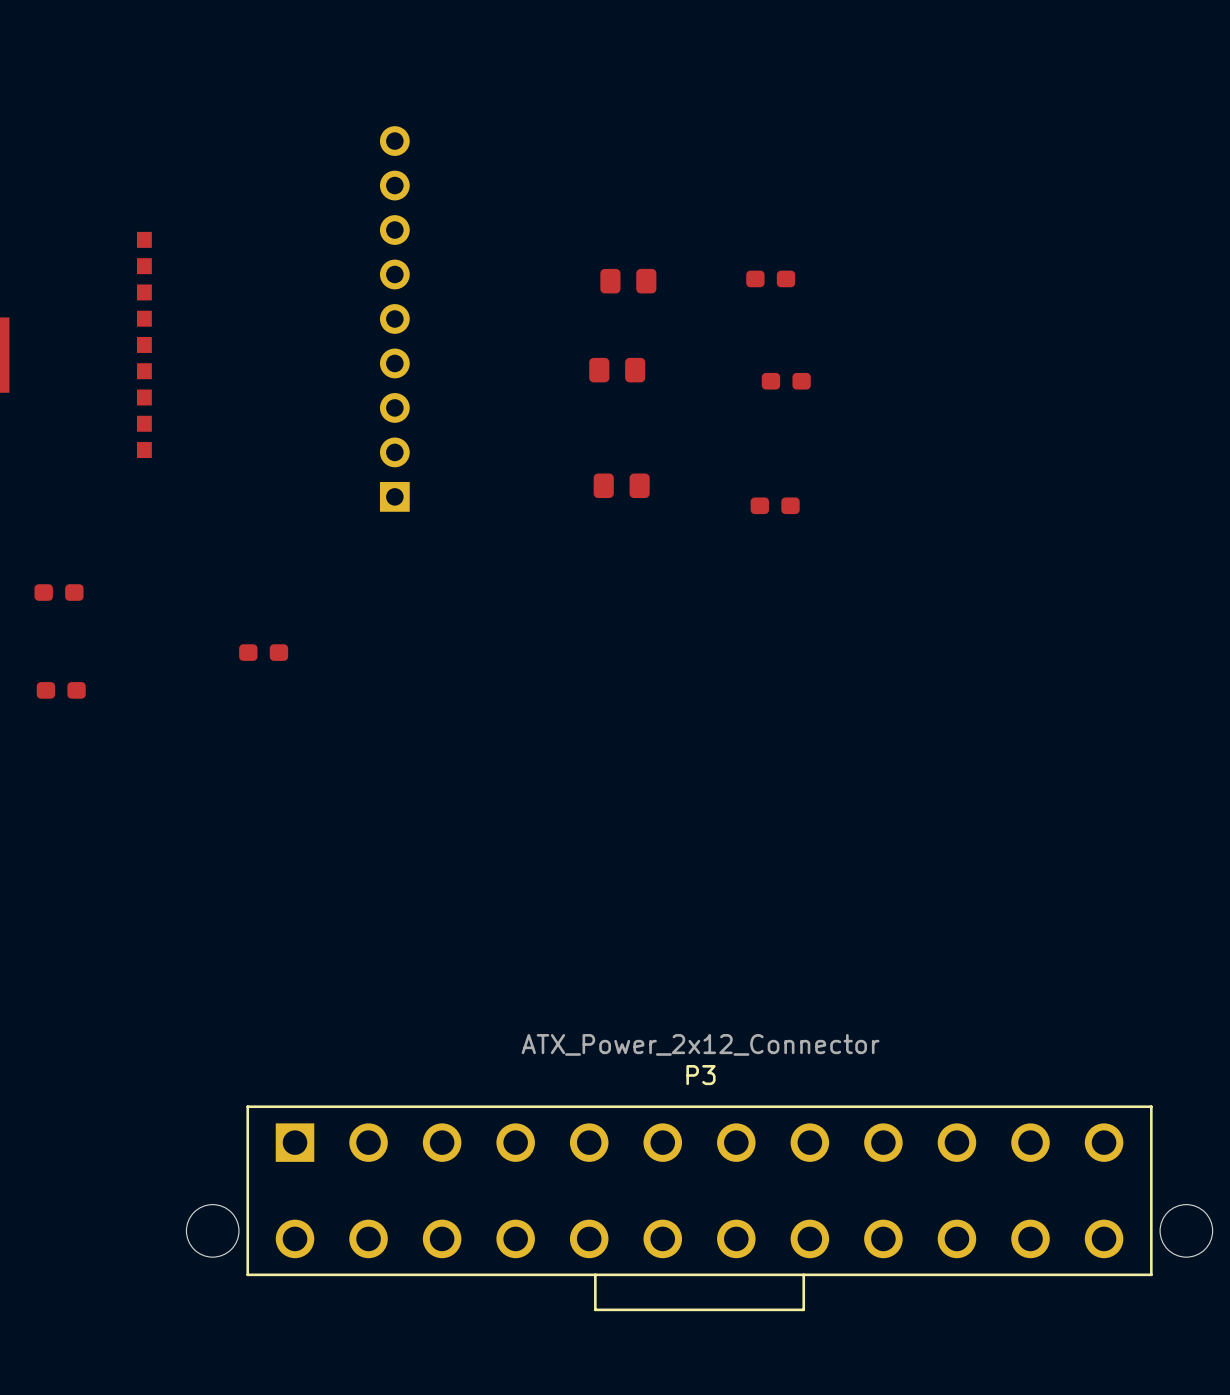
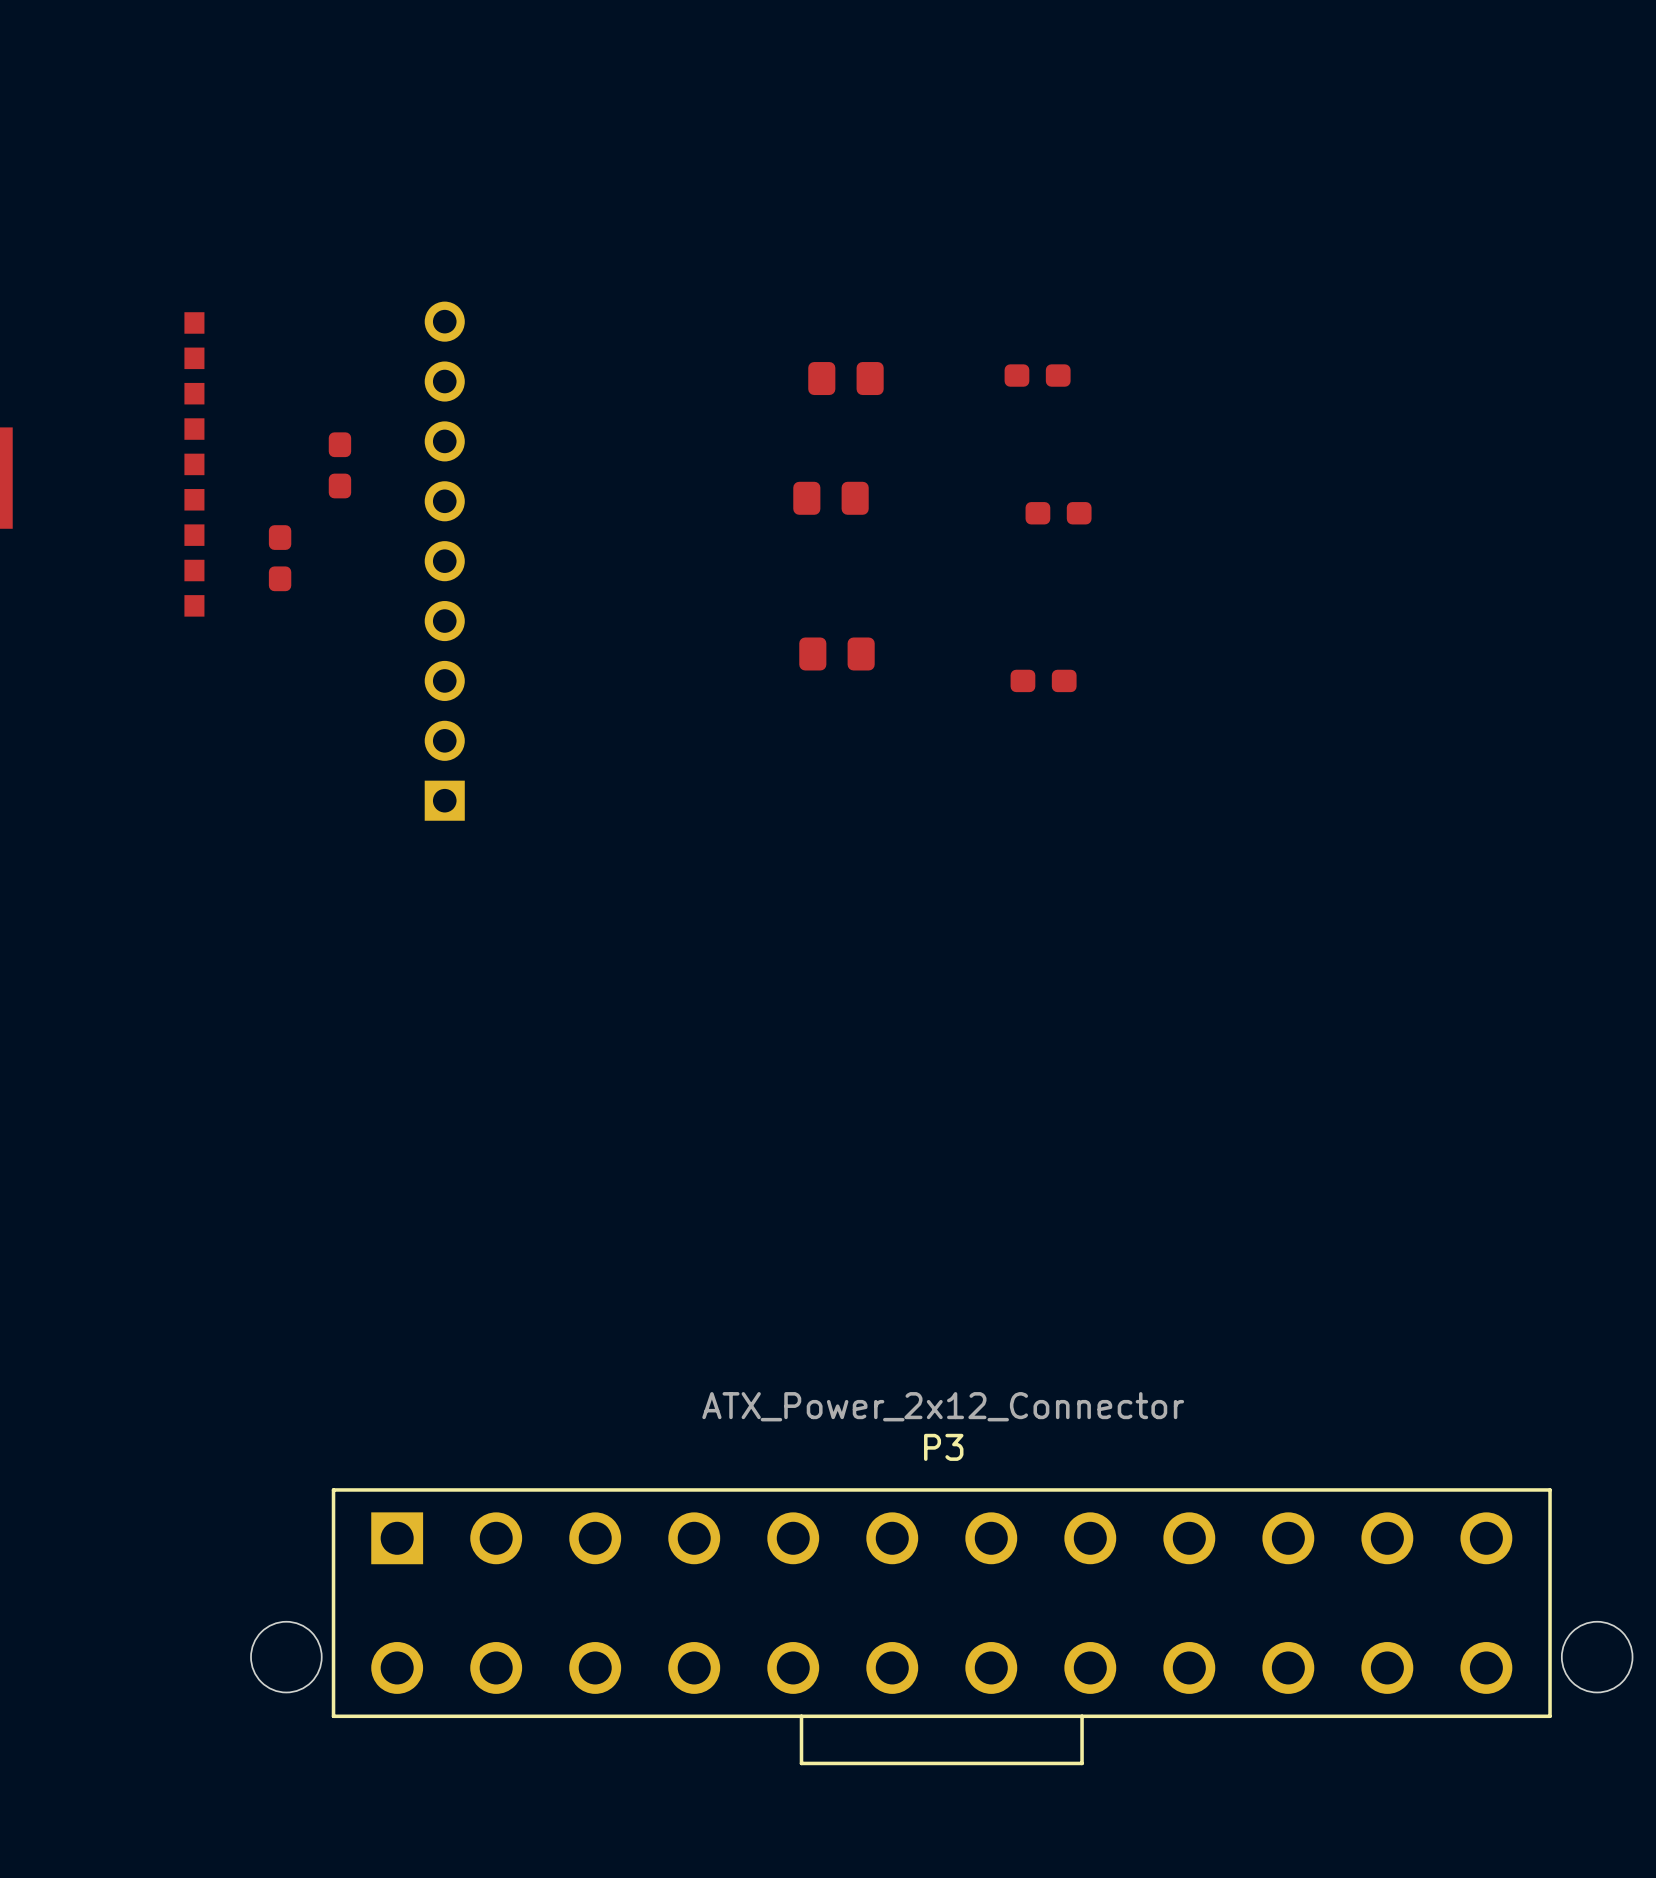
part position: (394, 318) -> (444, 561)
part: none -> (339, 465)
part: none -> (280, 558)
part: (59, 592) -> none
part: (263, 652) -> none
part: (61, 690) -> none

